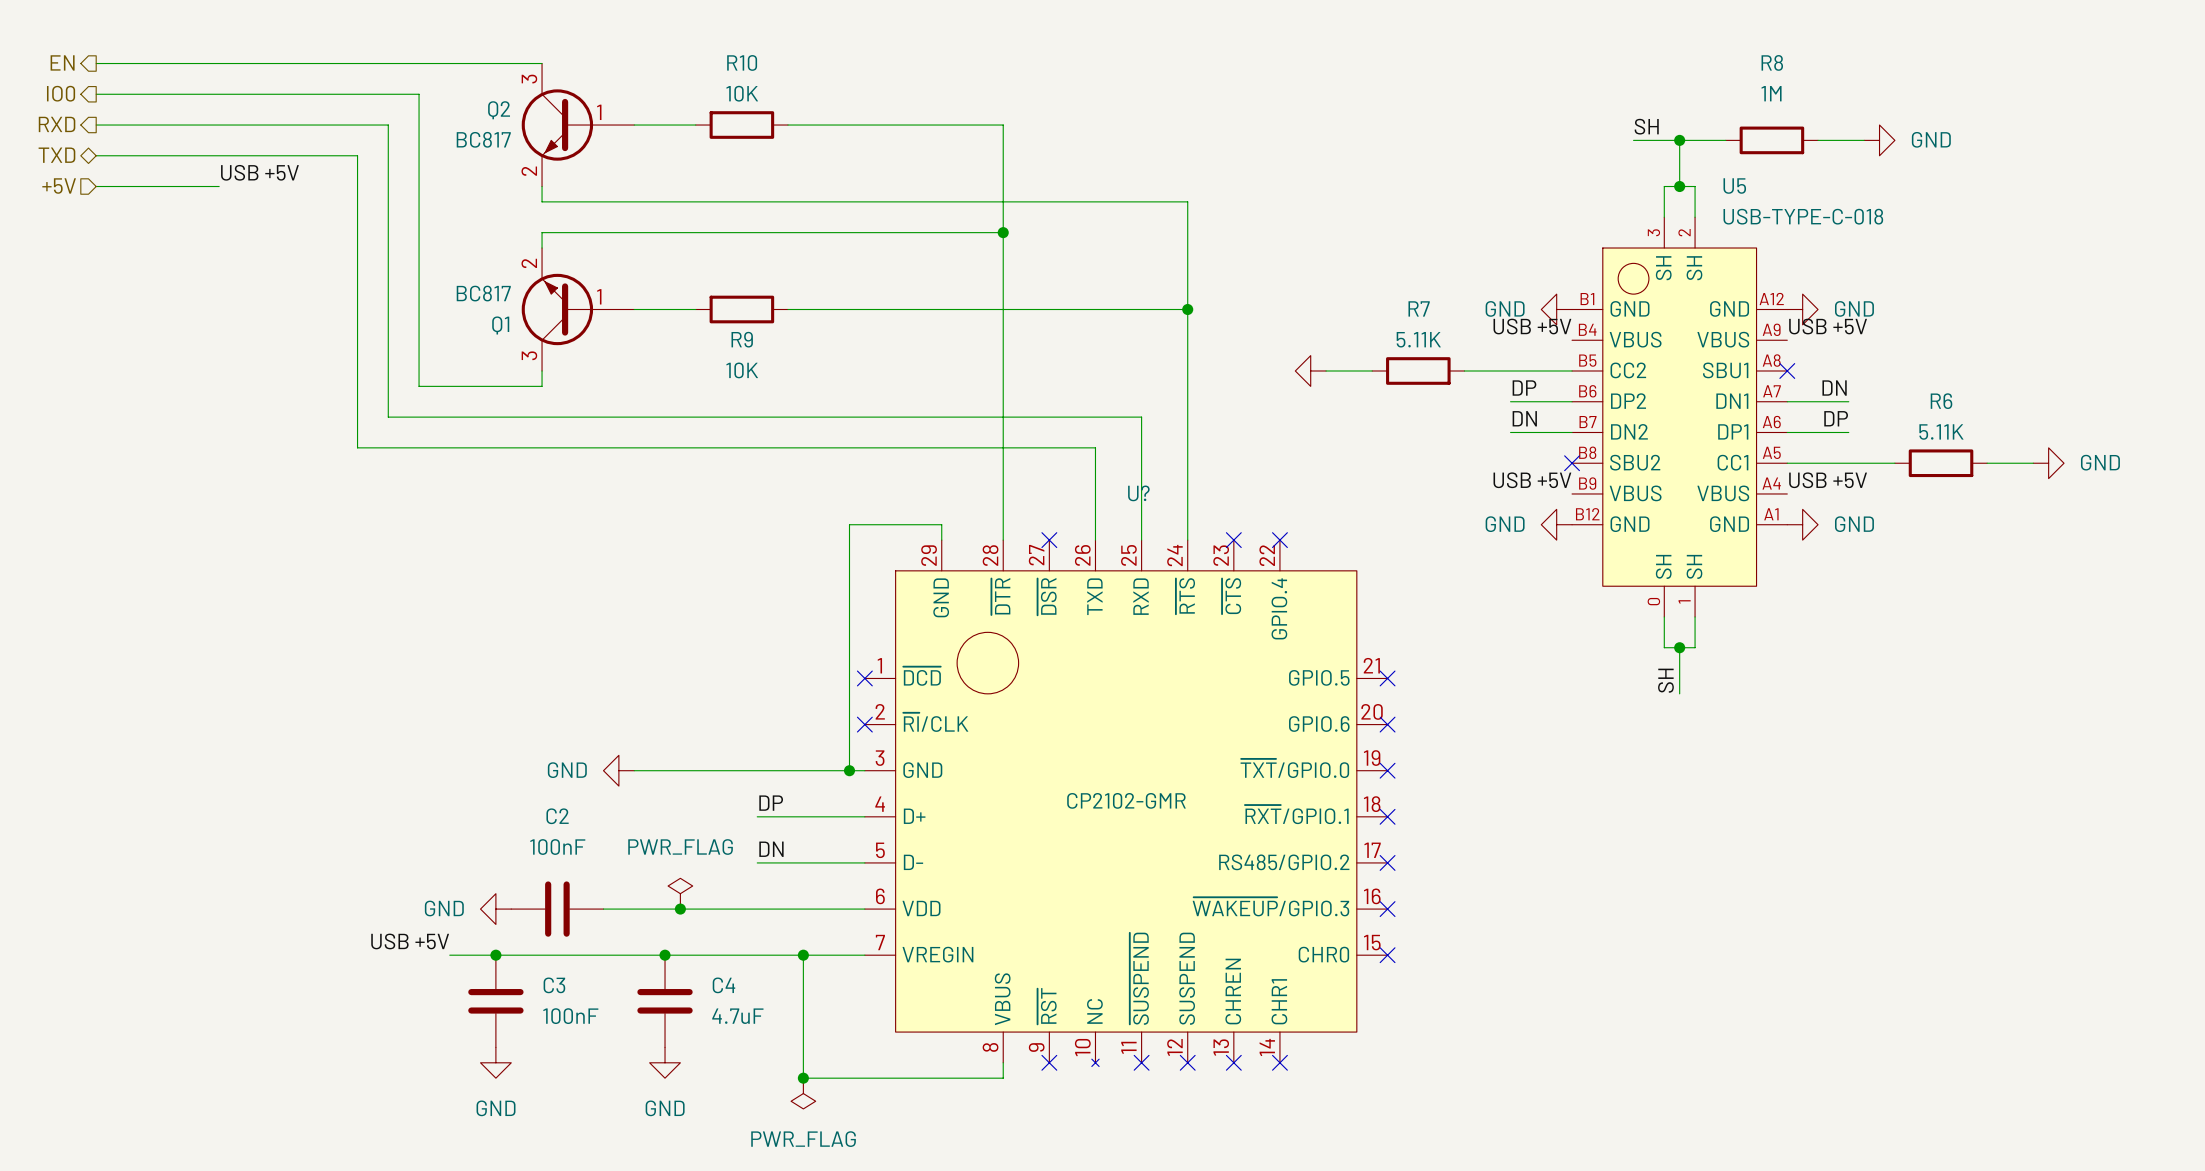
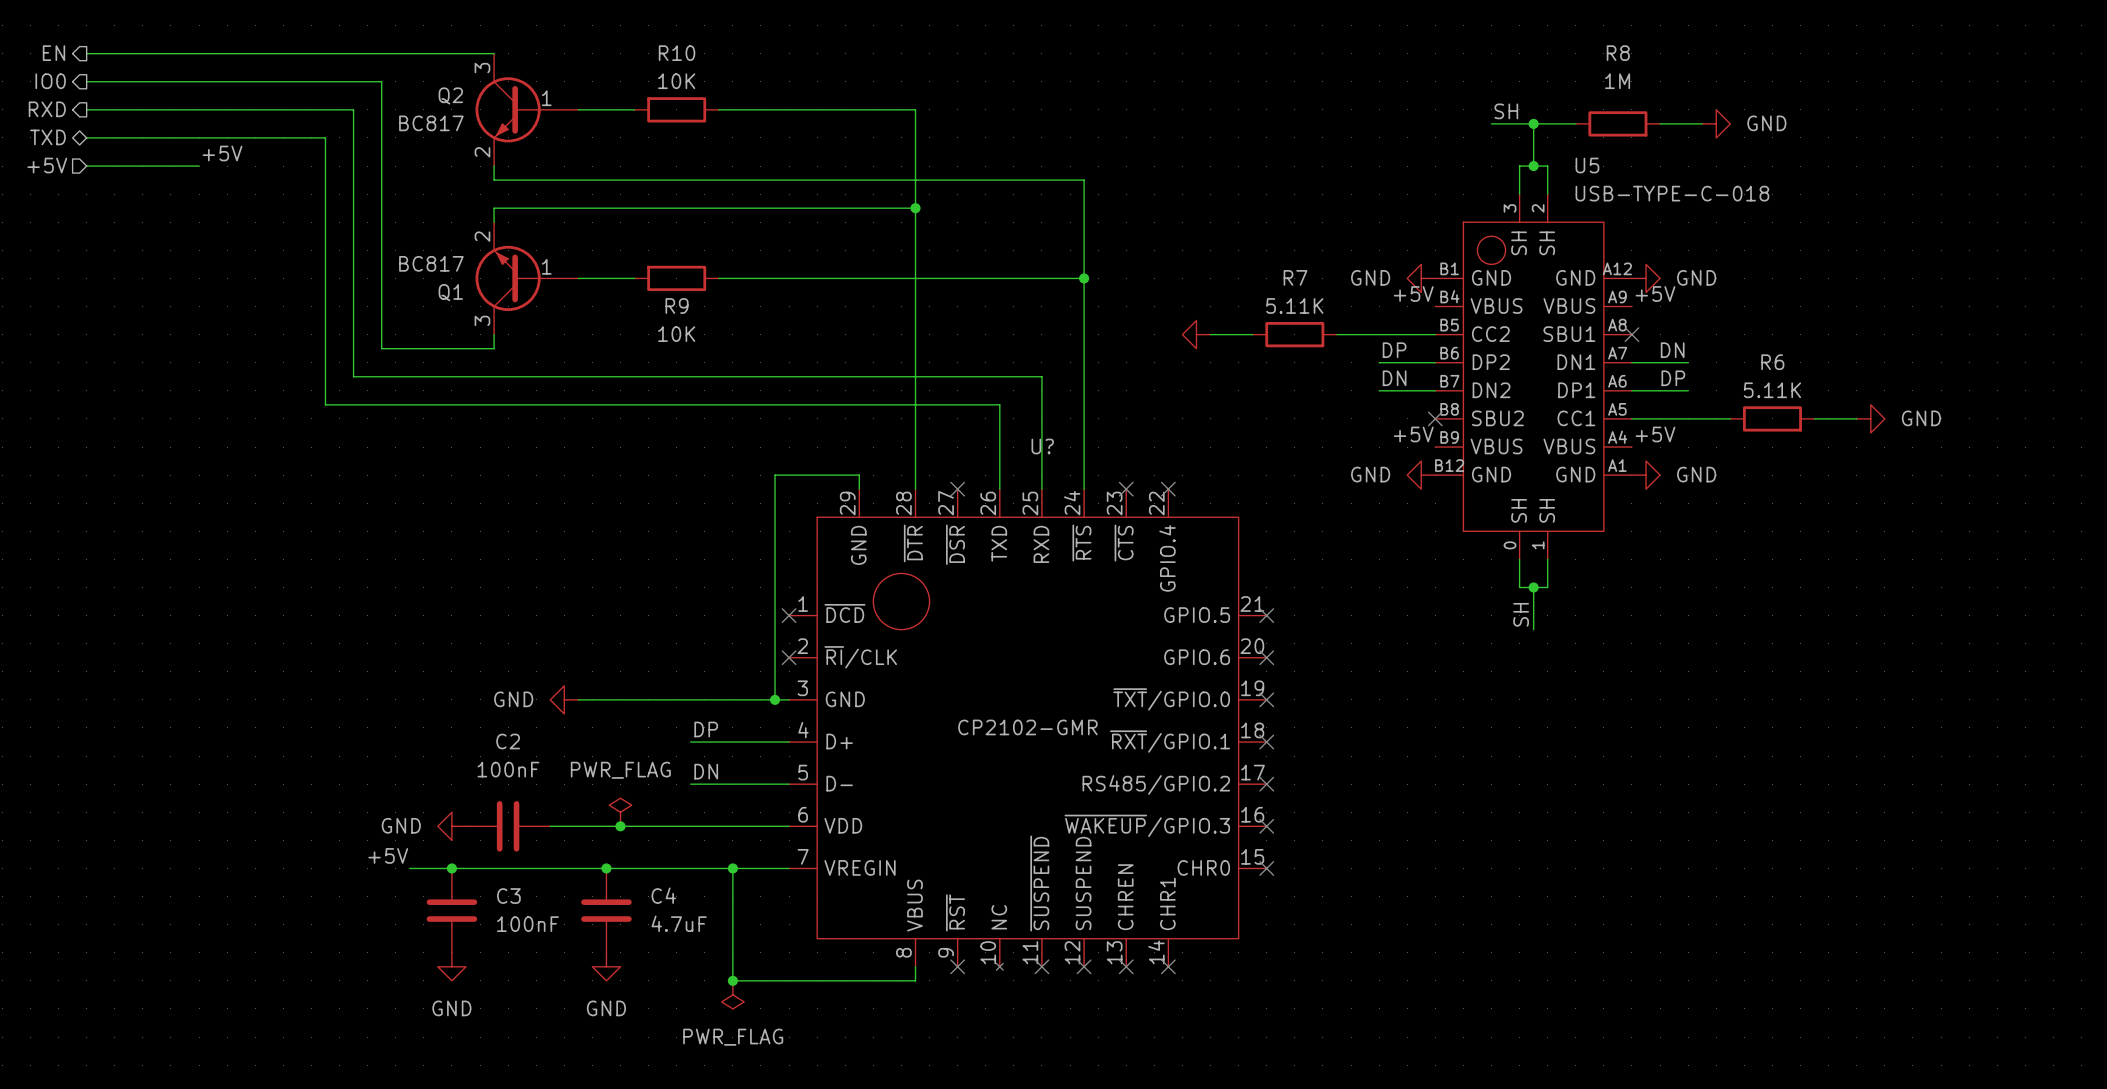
label: USB +5V (259, 172) -> +5V (222, 153)
label: USB +5V (1532, 326) -> +5V (1413, 293)
label: USB +5V (1828, 326) -> +5V (1655, 293)
label: USB +5V (1532, 480) -> +5V (1413, 434)
label: USB +5V (1828, 480) -> +5V (1655, 434)
label: USB +5V (410, 941) -> +5V (388, 855)

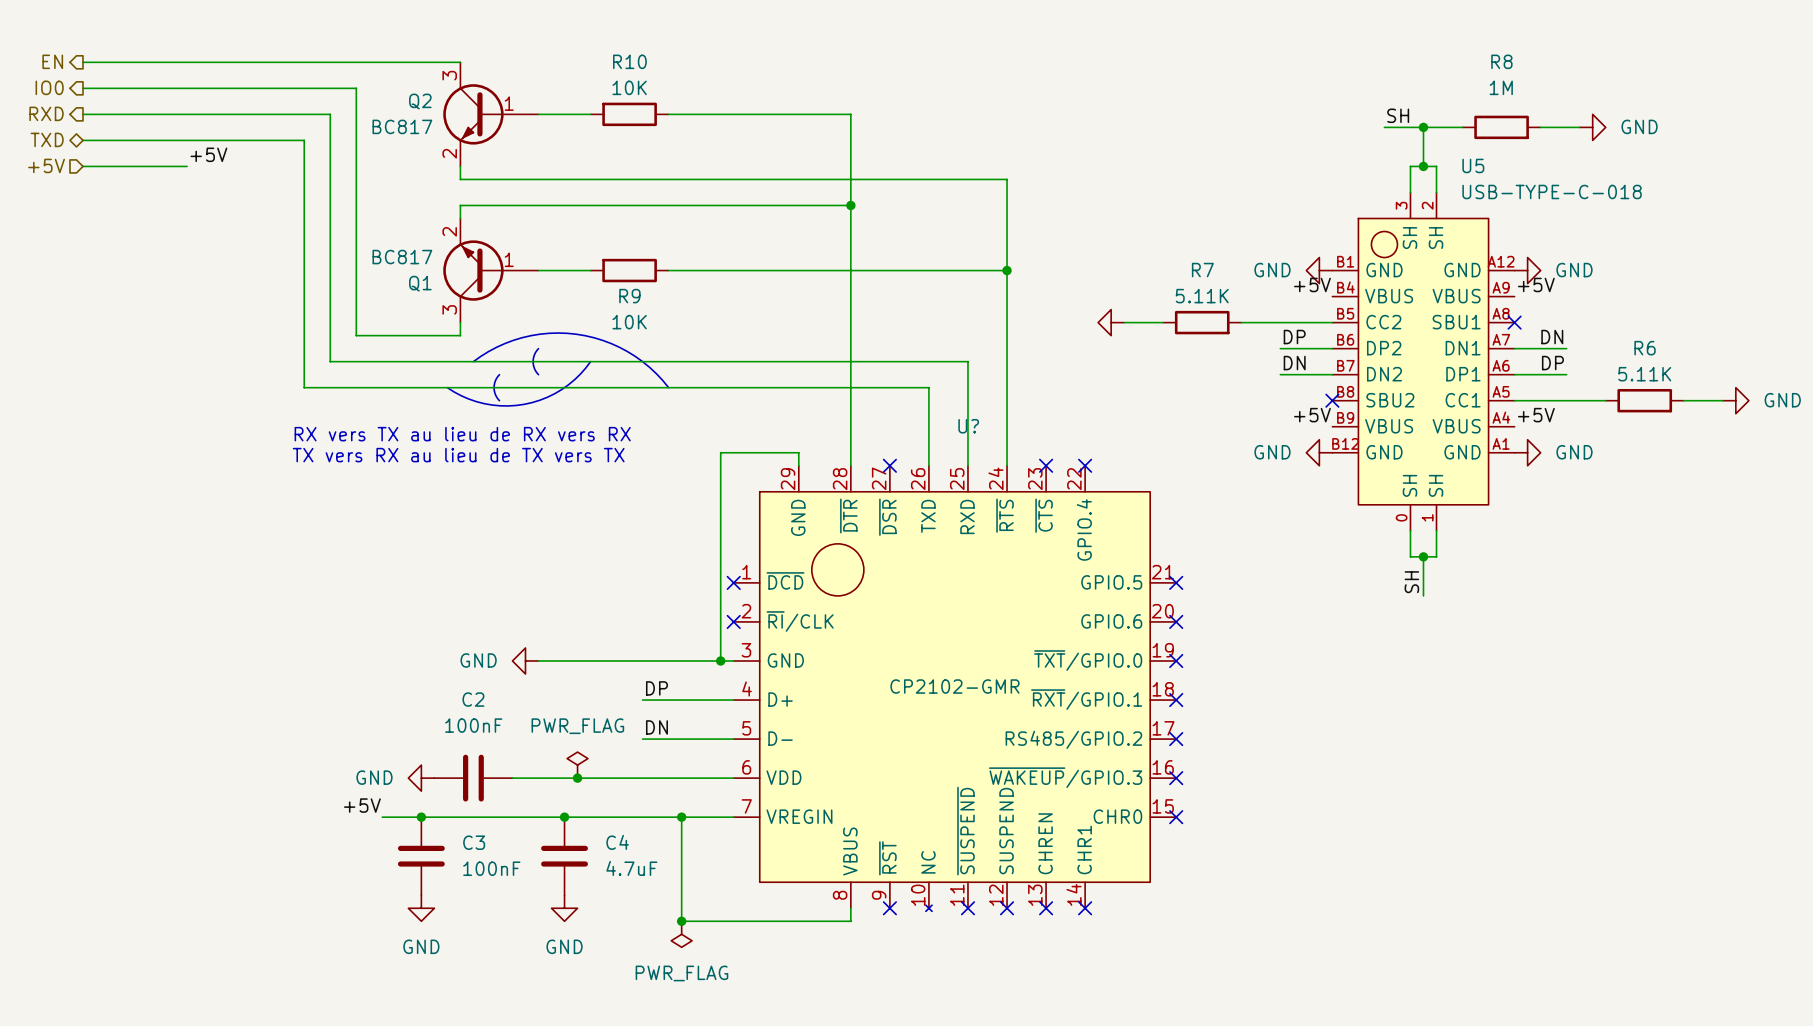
line: none -> (538, 348) (533, 361) (538, 374)
line: none -> (473, 361) (496, 347) (522, 337) (549, 333) (576, 334) (603, 340) (627, 351) (650, 367) (668, 387)
line: none -> (590, 361) (574, 379) (561, 389) (547, 397) (524, 404) (500, 405) (484, 403) (468, 399) (447, 387)
line: none -> (499, 374) (494, 387) (499, 400)
text: none -> RX vers TX au lieu de RX vers RX (462, 434)
text: none -> TX vers RX au lieu de TX vers TX (458, 455)

